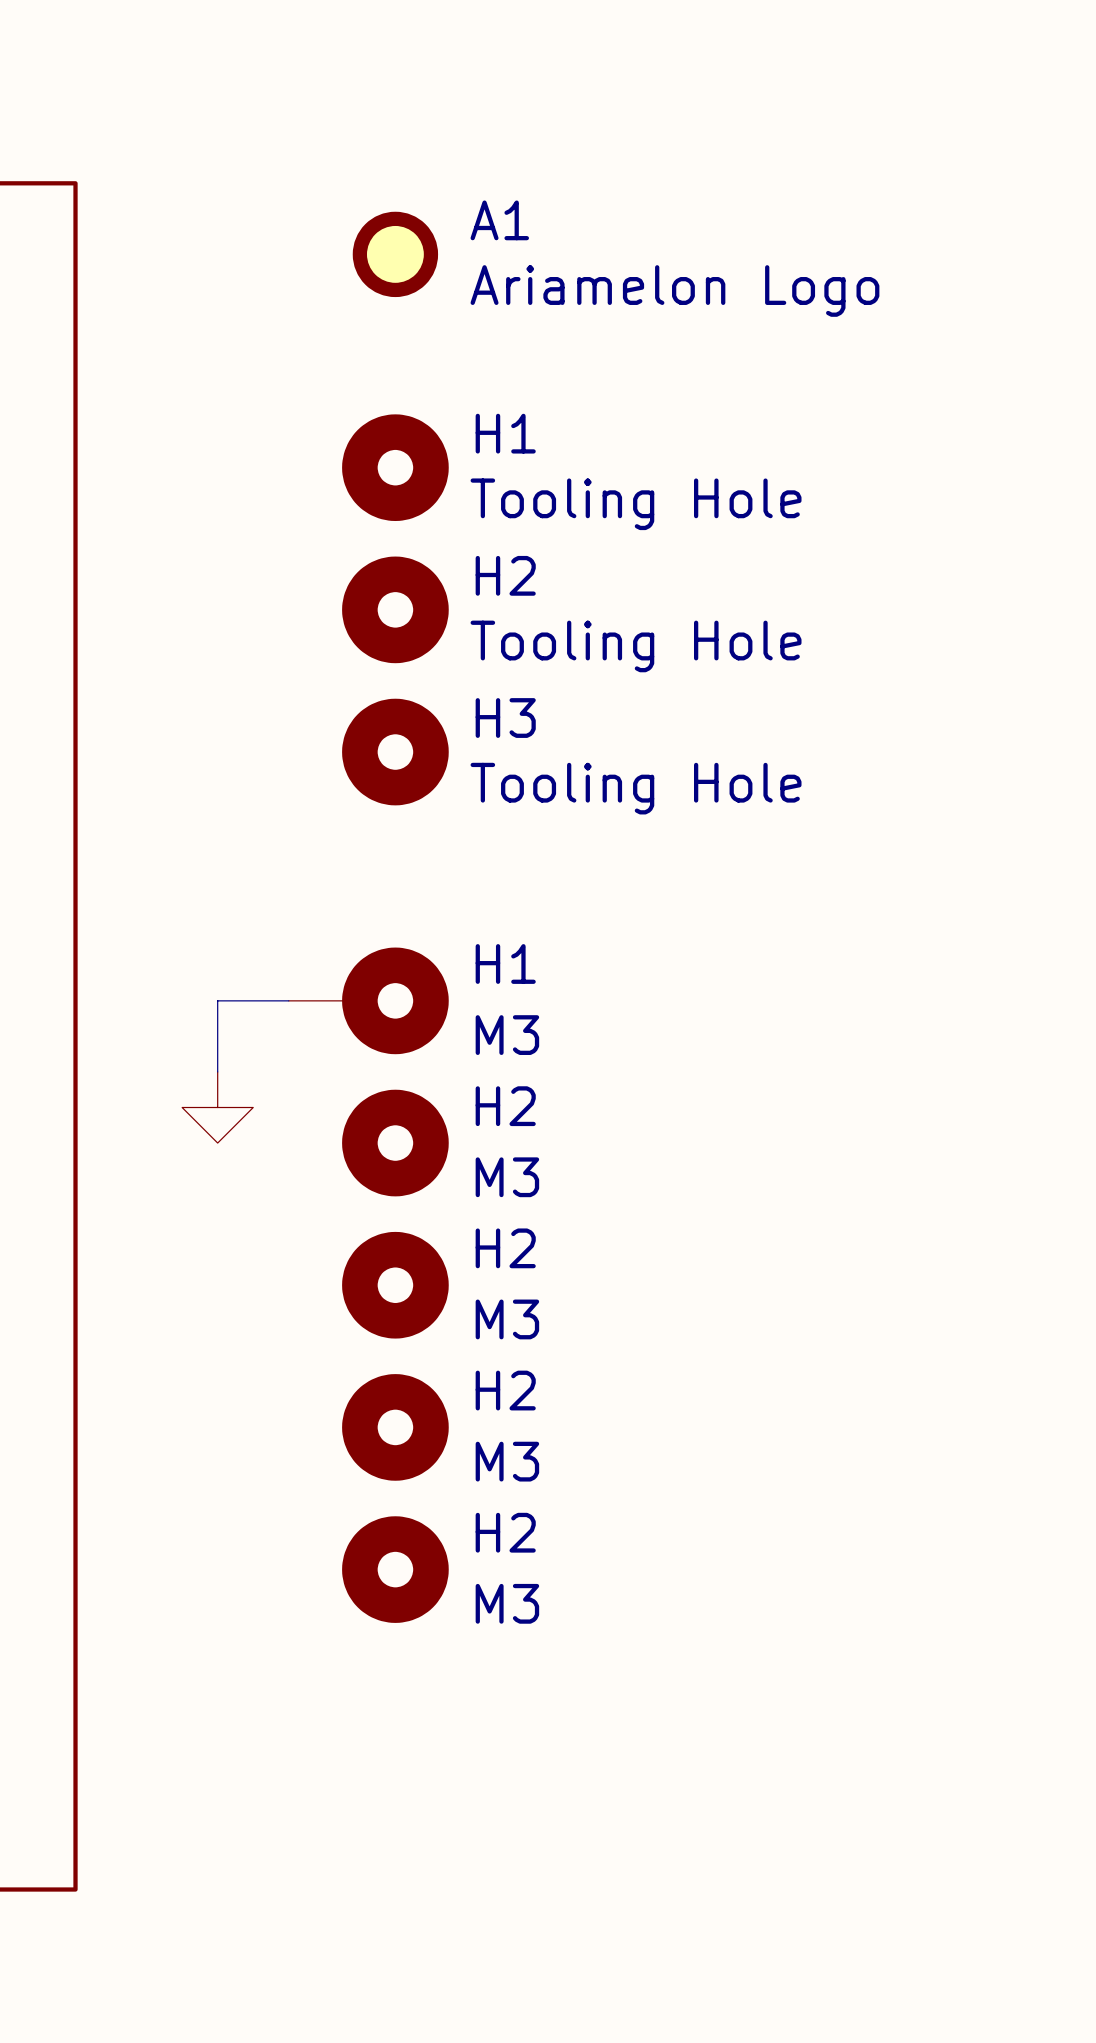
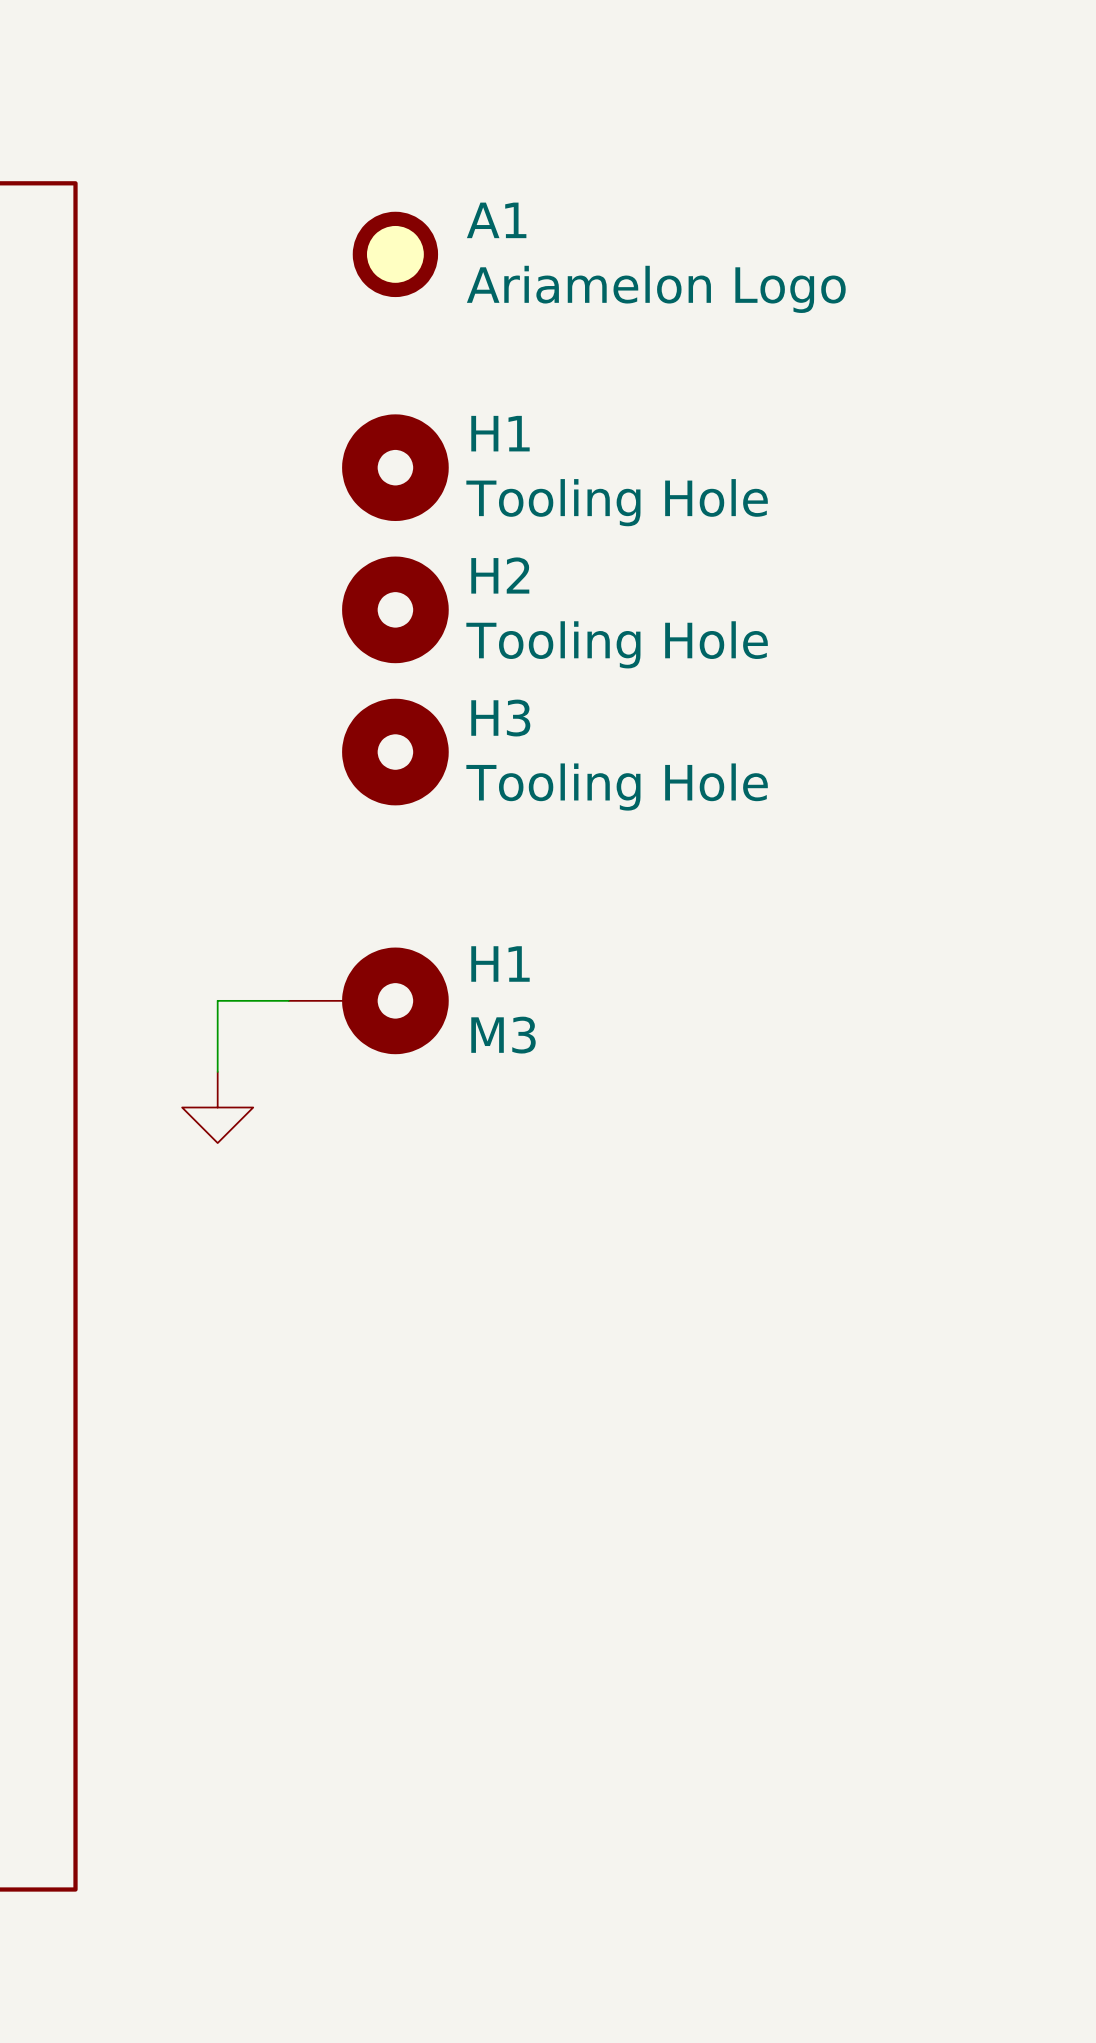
H2: M3 (395, 1143) -> none
H2: M3 (395, 1285) -> none
H2: M3 (395, 1427) -> none
H2: M3 (395, 1569) -> none

